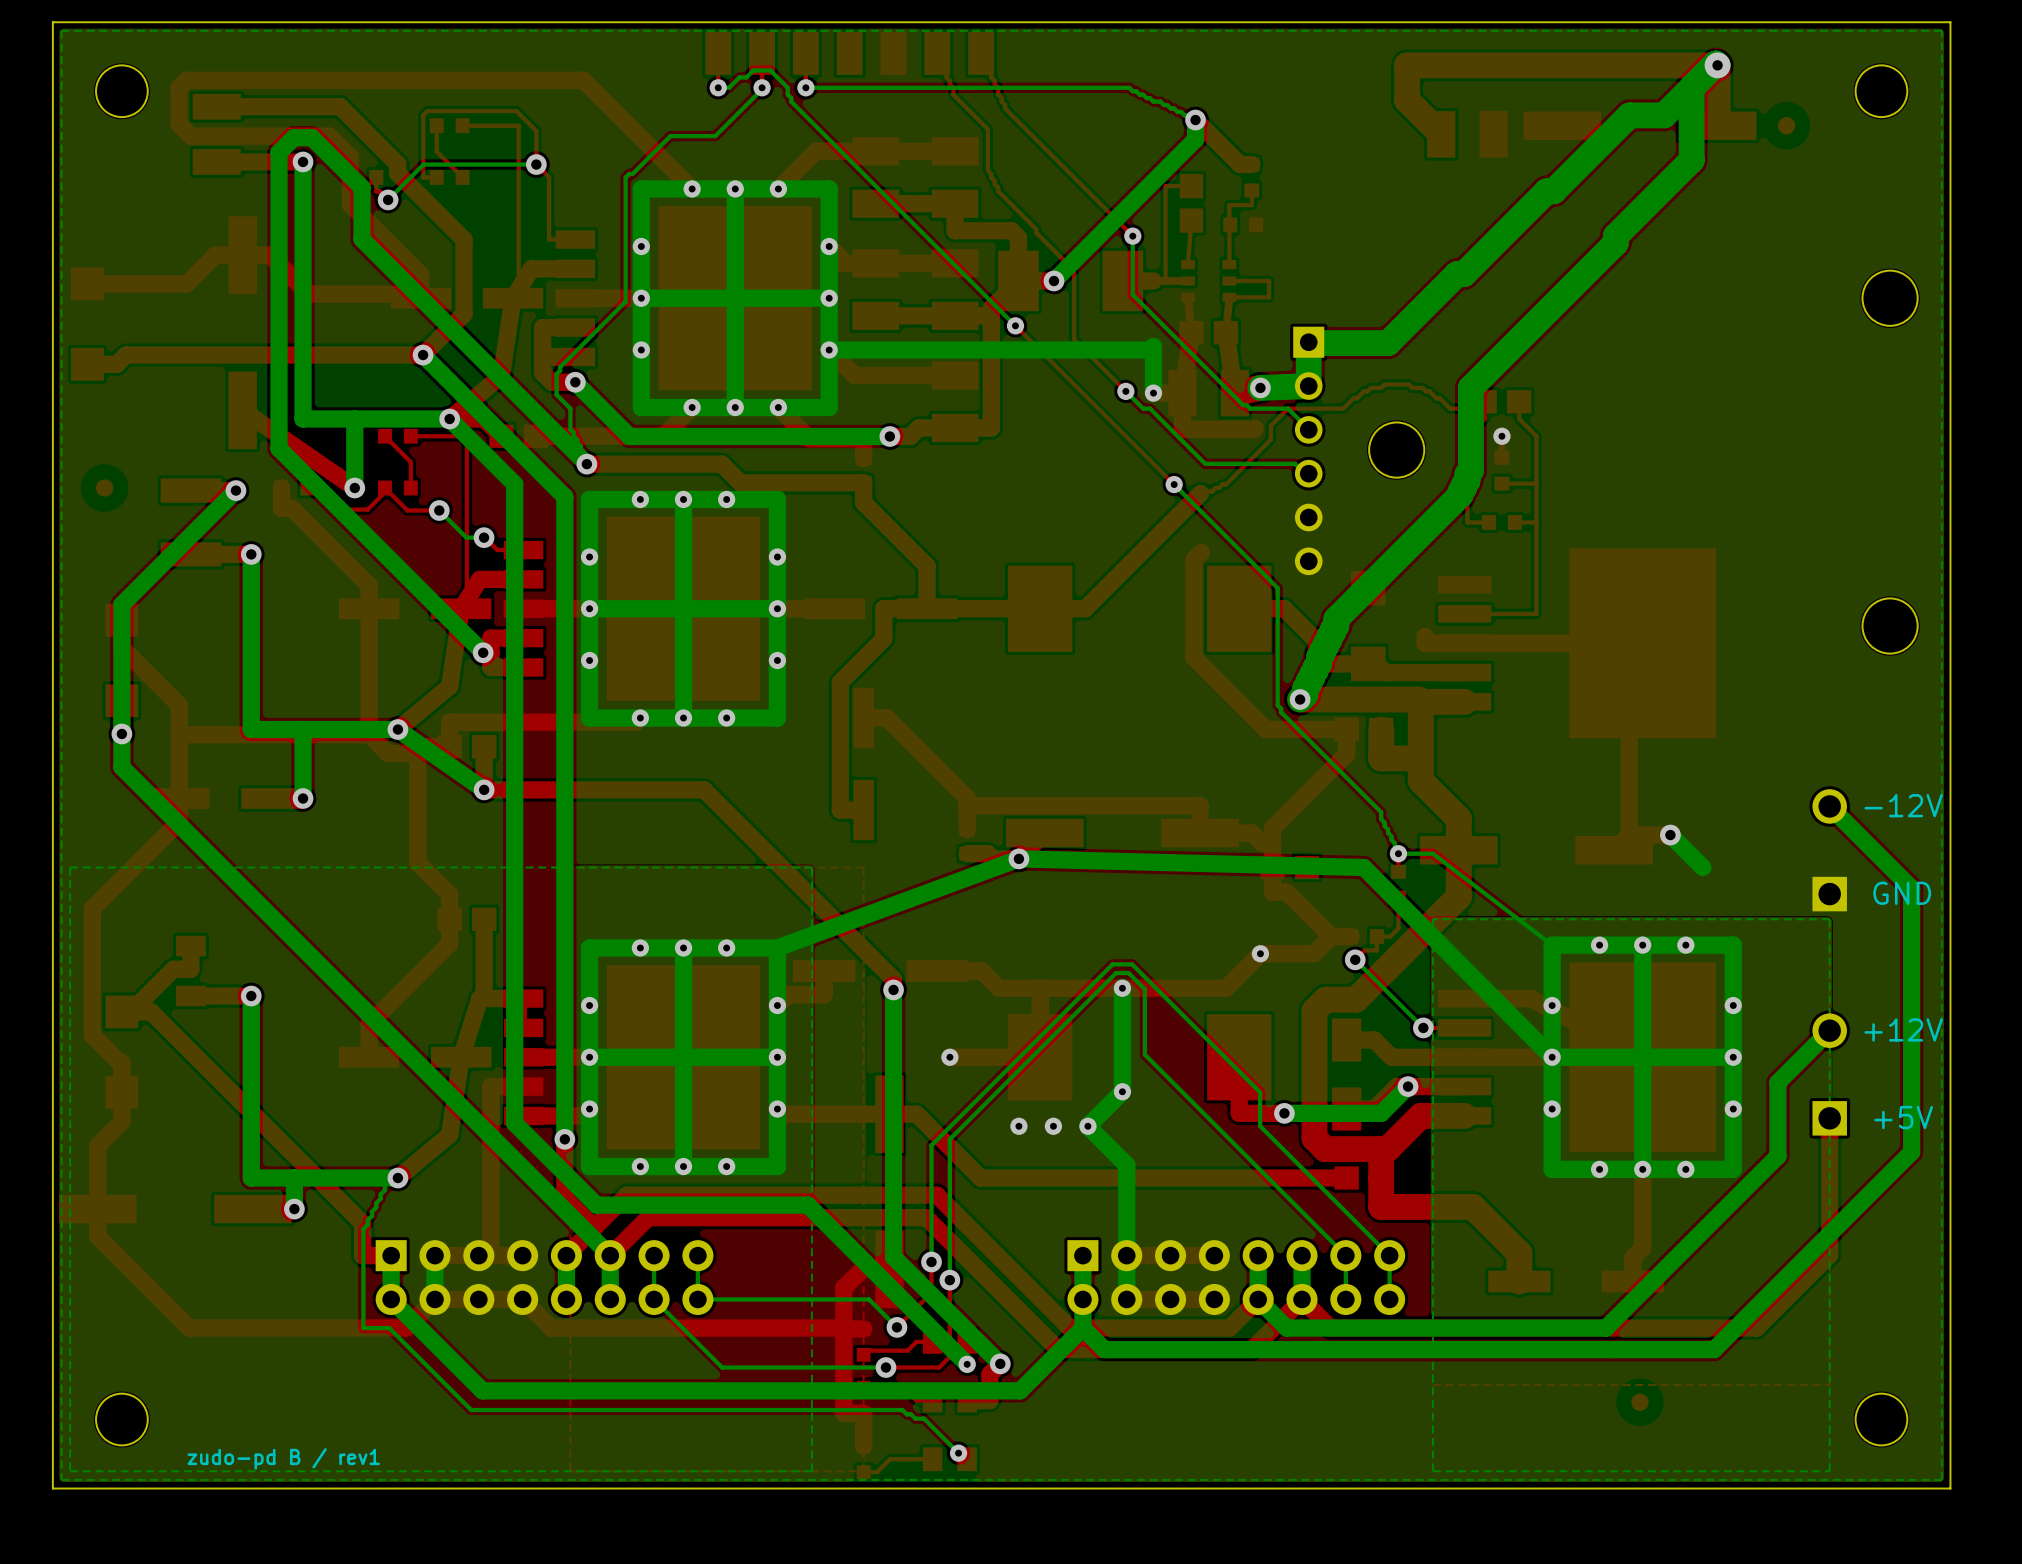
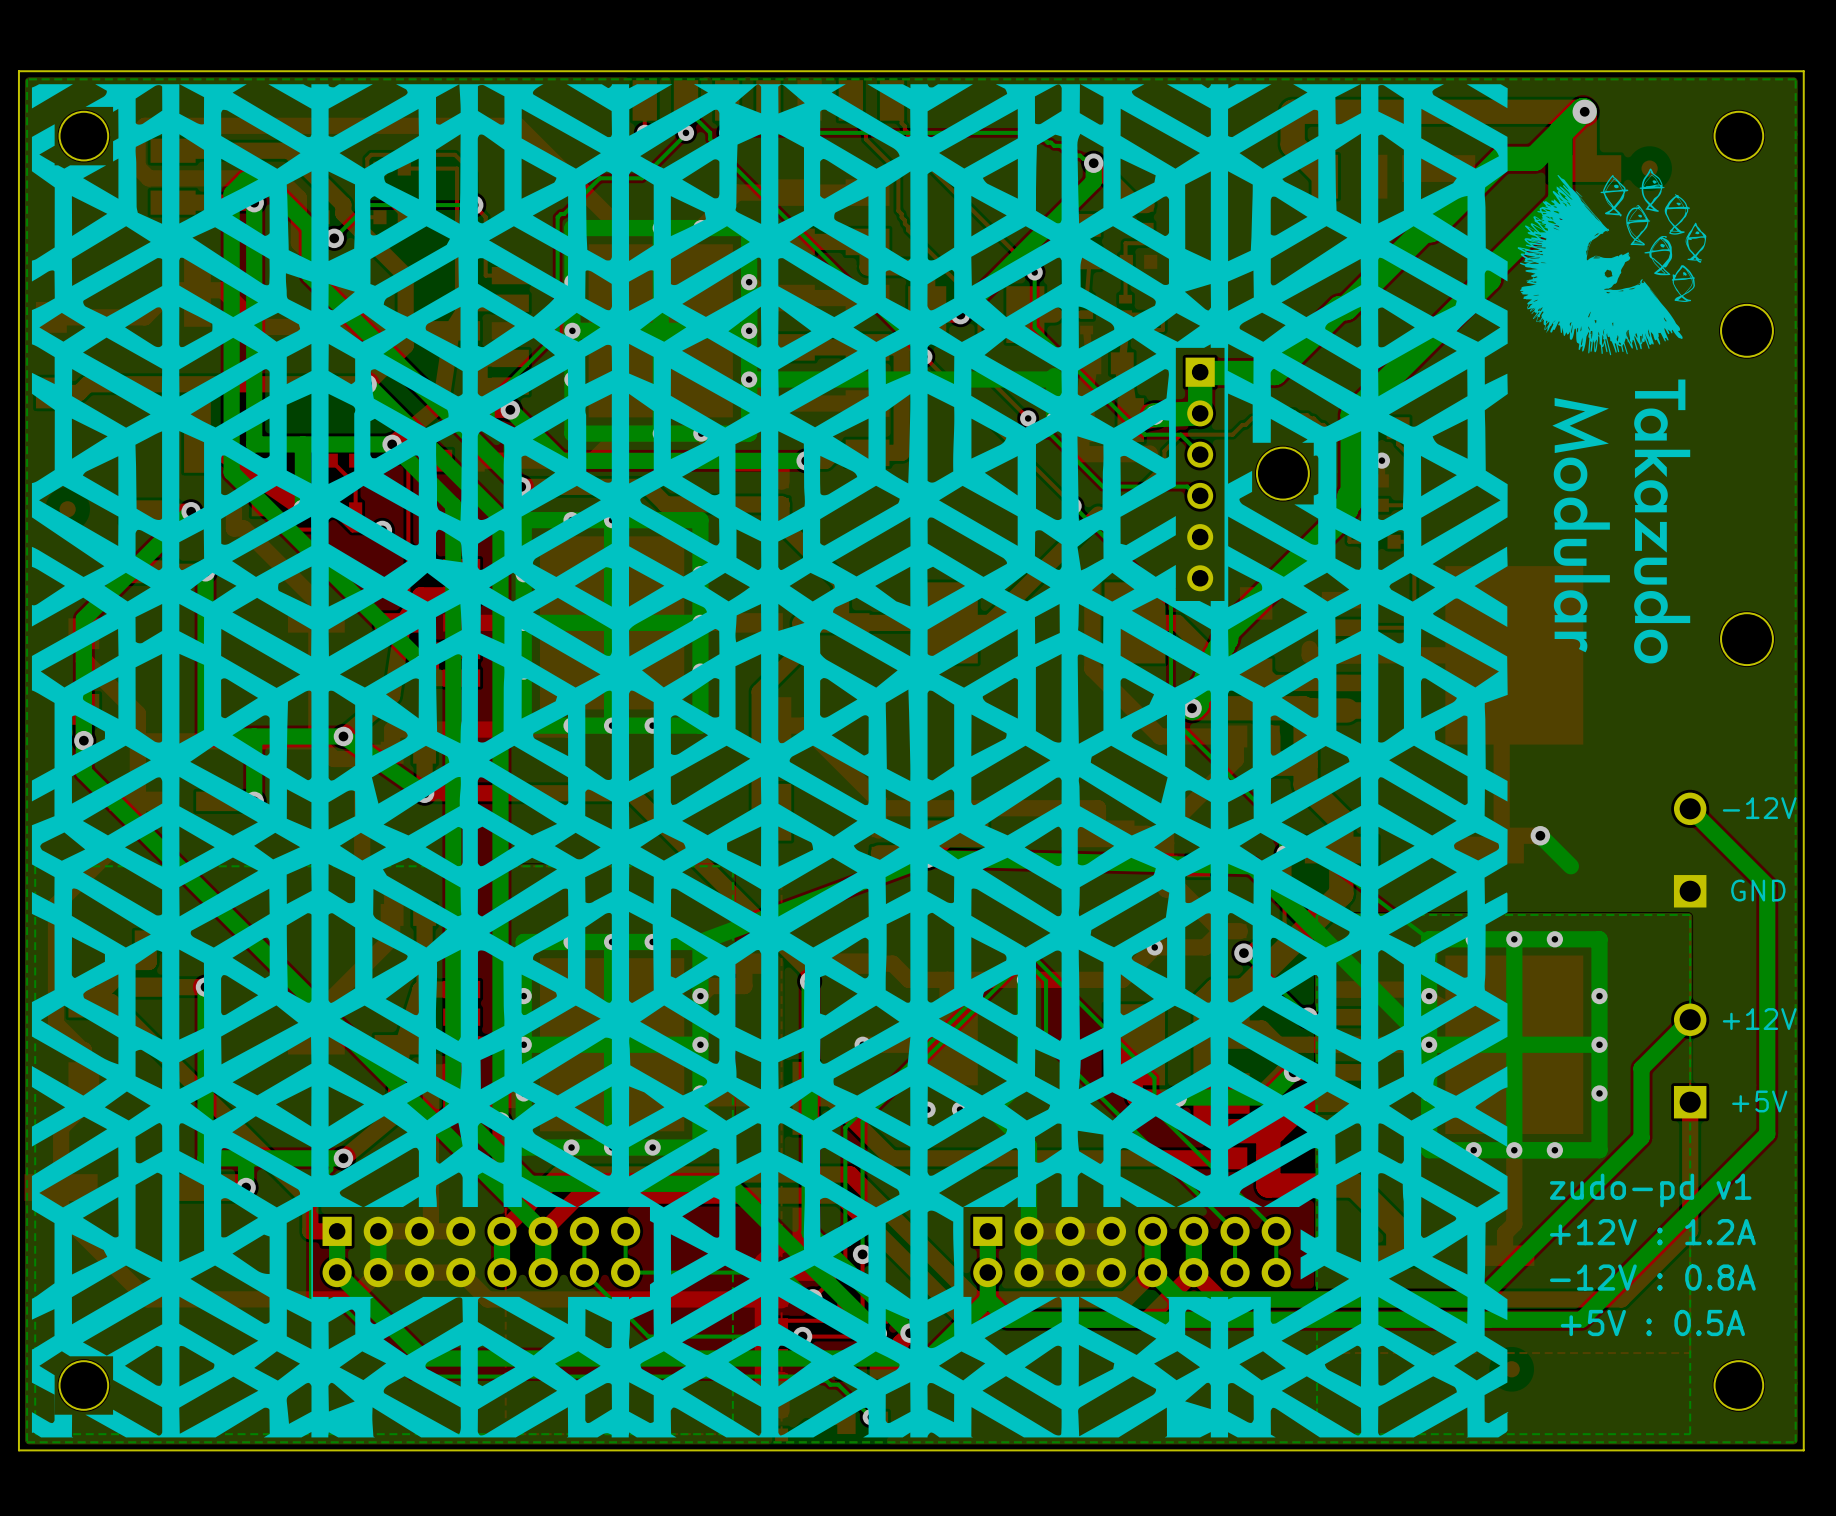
drawing: none -> [31, 84, 1707, 1438]
drawing: none -> [1634, 379, 1691, 664]
drawing: none -> [1552, 397, 1610, 653]
text: none -> zudo-pd v1 (1650, 1190)
text: none -> +12V : 1.2A (1652, 1232)
text: none -> -12V : 0.8A (1652, 1277)
text: none -> +5V : 0.5A (1652, 1322)
text: zudo-pd B / rev1 (283, 1458) -> none

